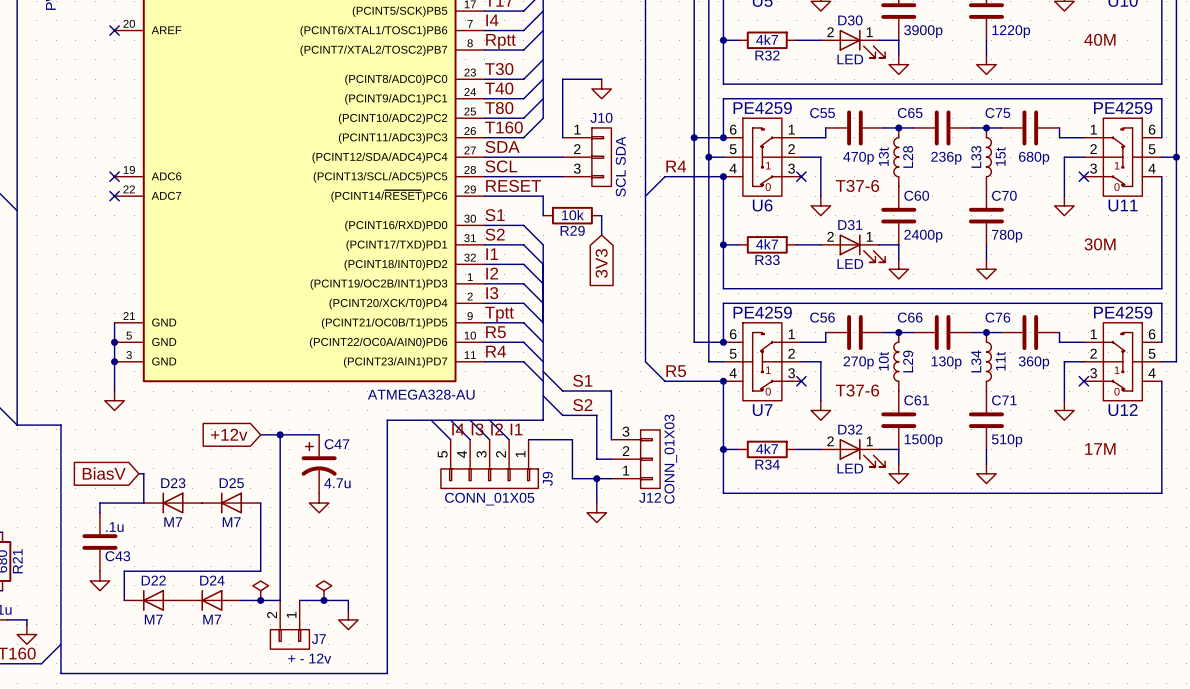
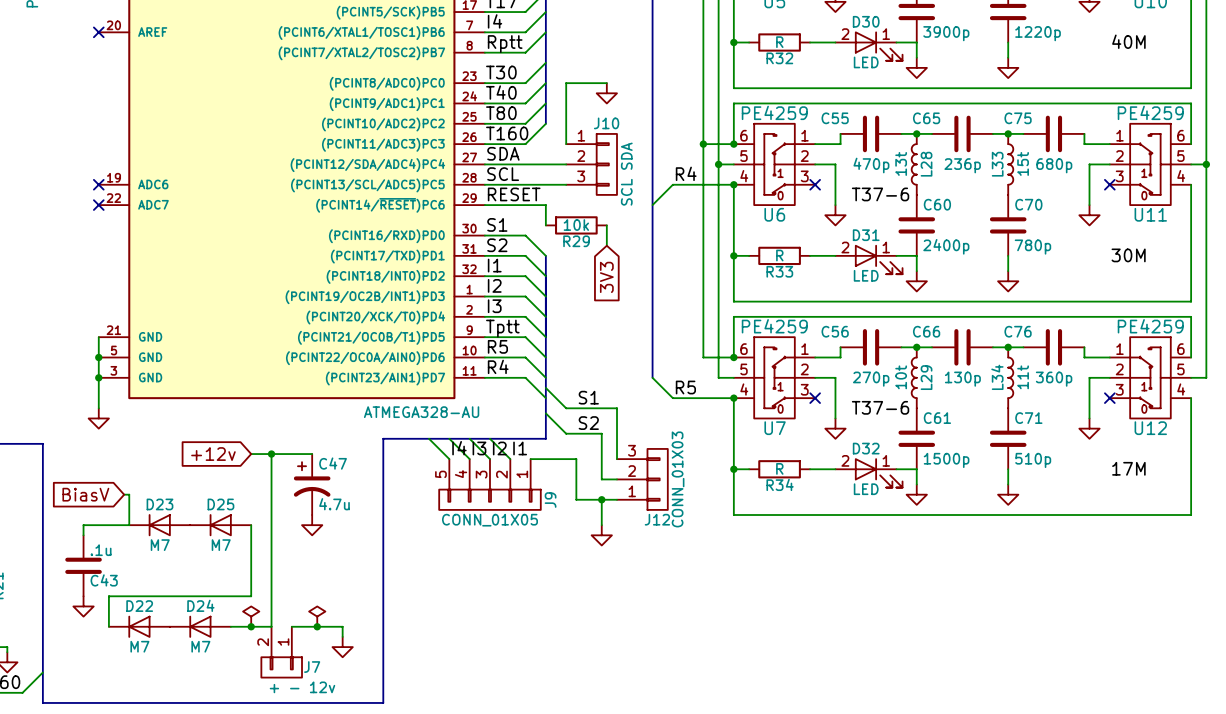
R32 value: 4k7 (767, 39) -> R (779, 42)
R33 value: 4k7 (767, 244) -> R (779, 255)
R34 value: 4k7 (767, 448) -> R (779, 468)

